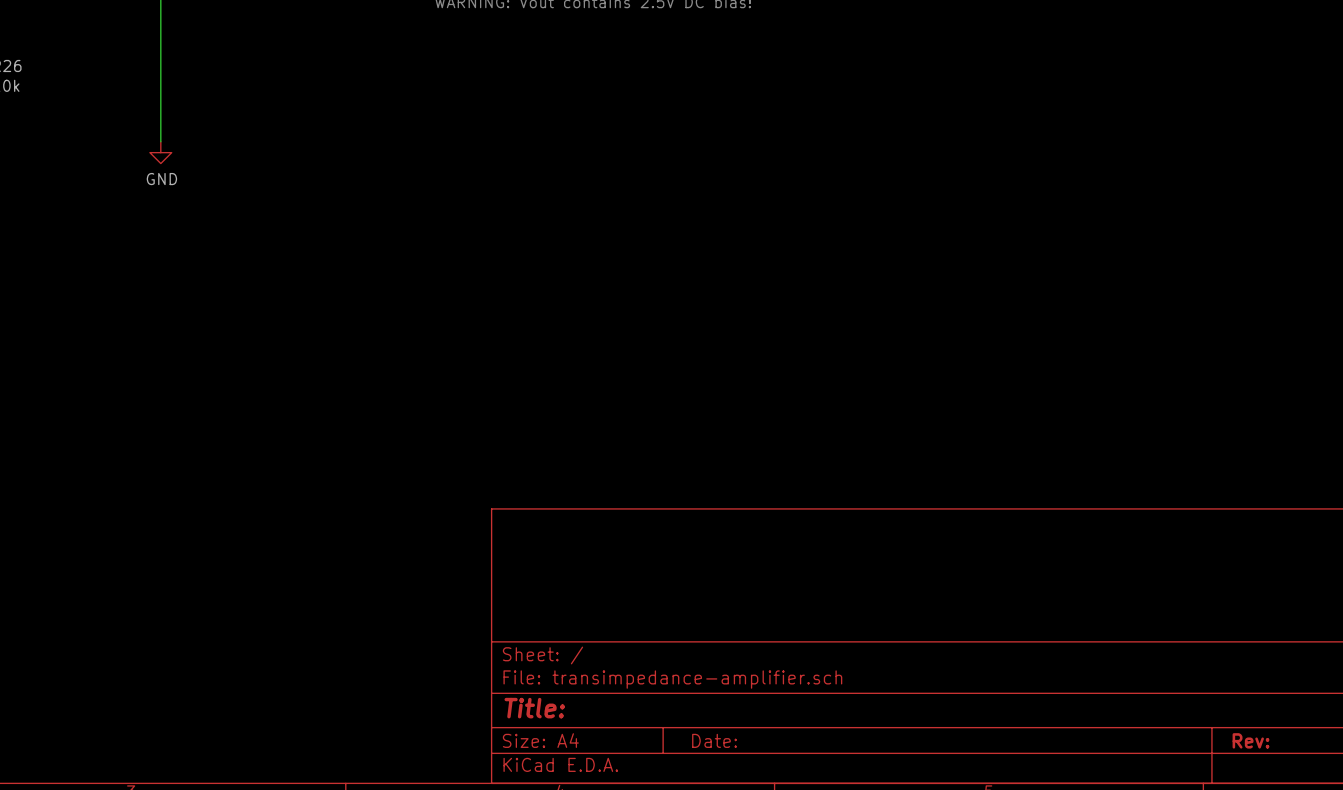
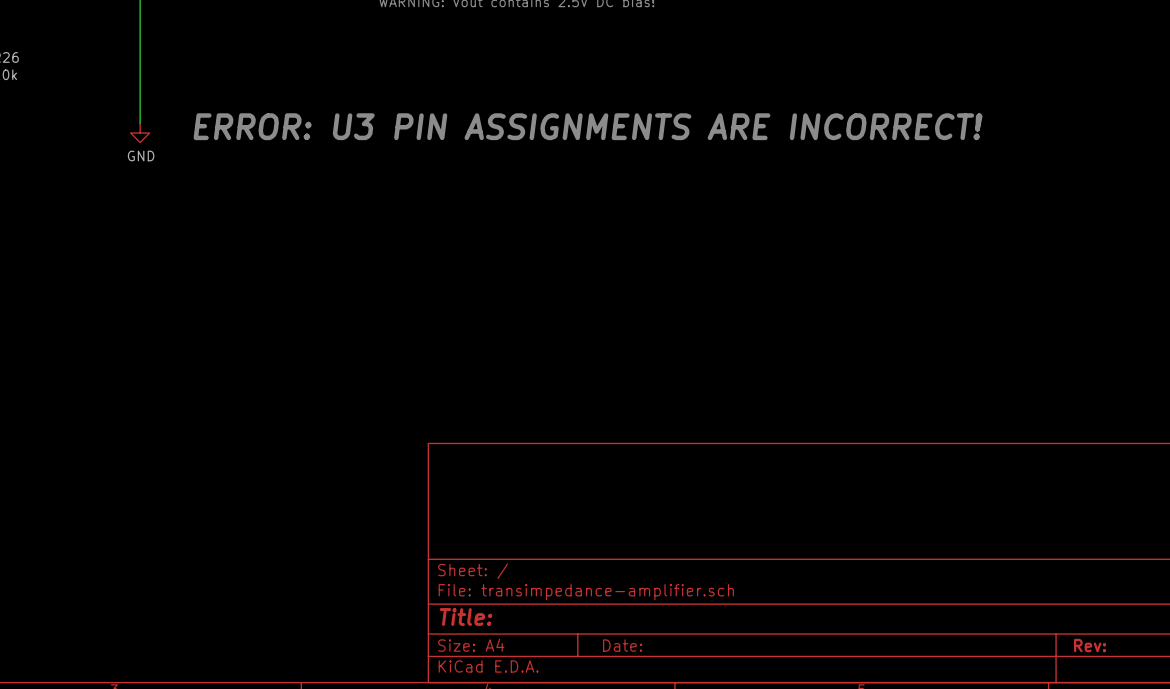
text: none -> ERROR: U3 PIN ASSIGNMENTS ARE INCORRECT! (588, 126)

